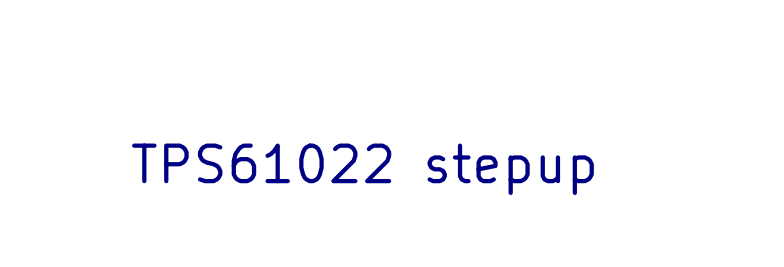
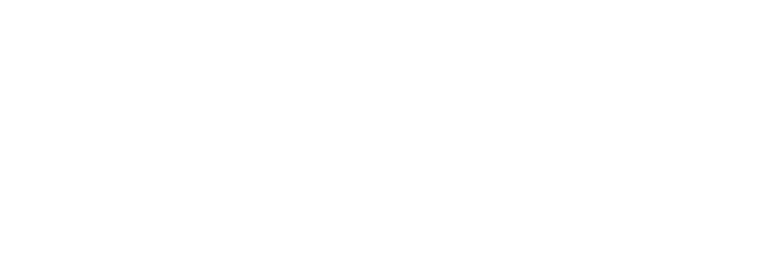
text: TPS61022 stepup (362, 169) -> none

